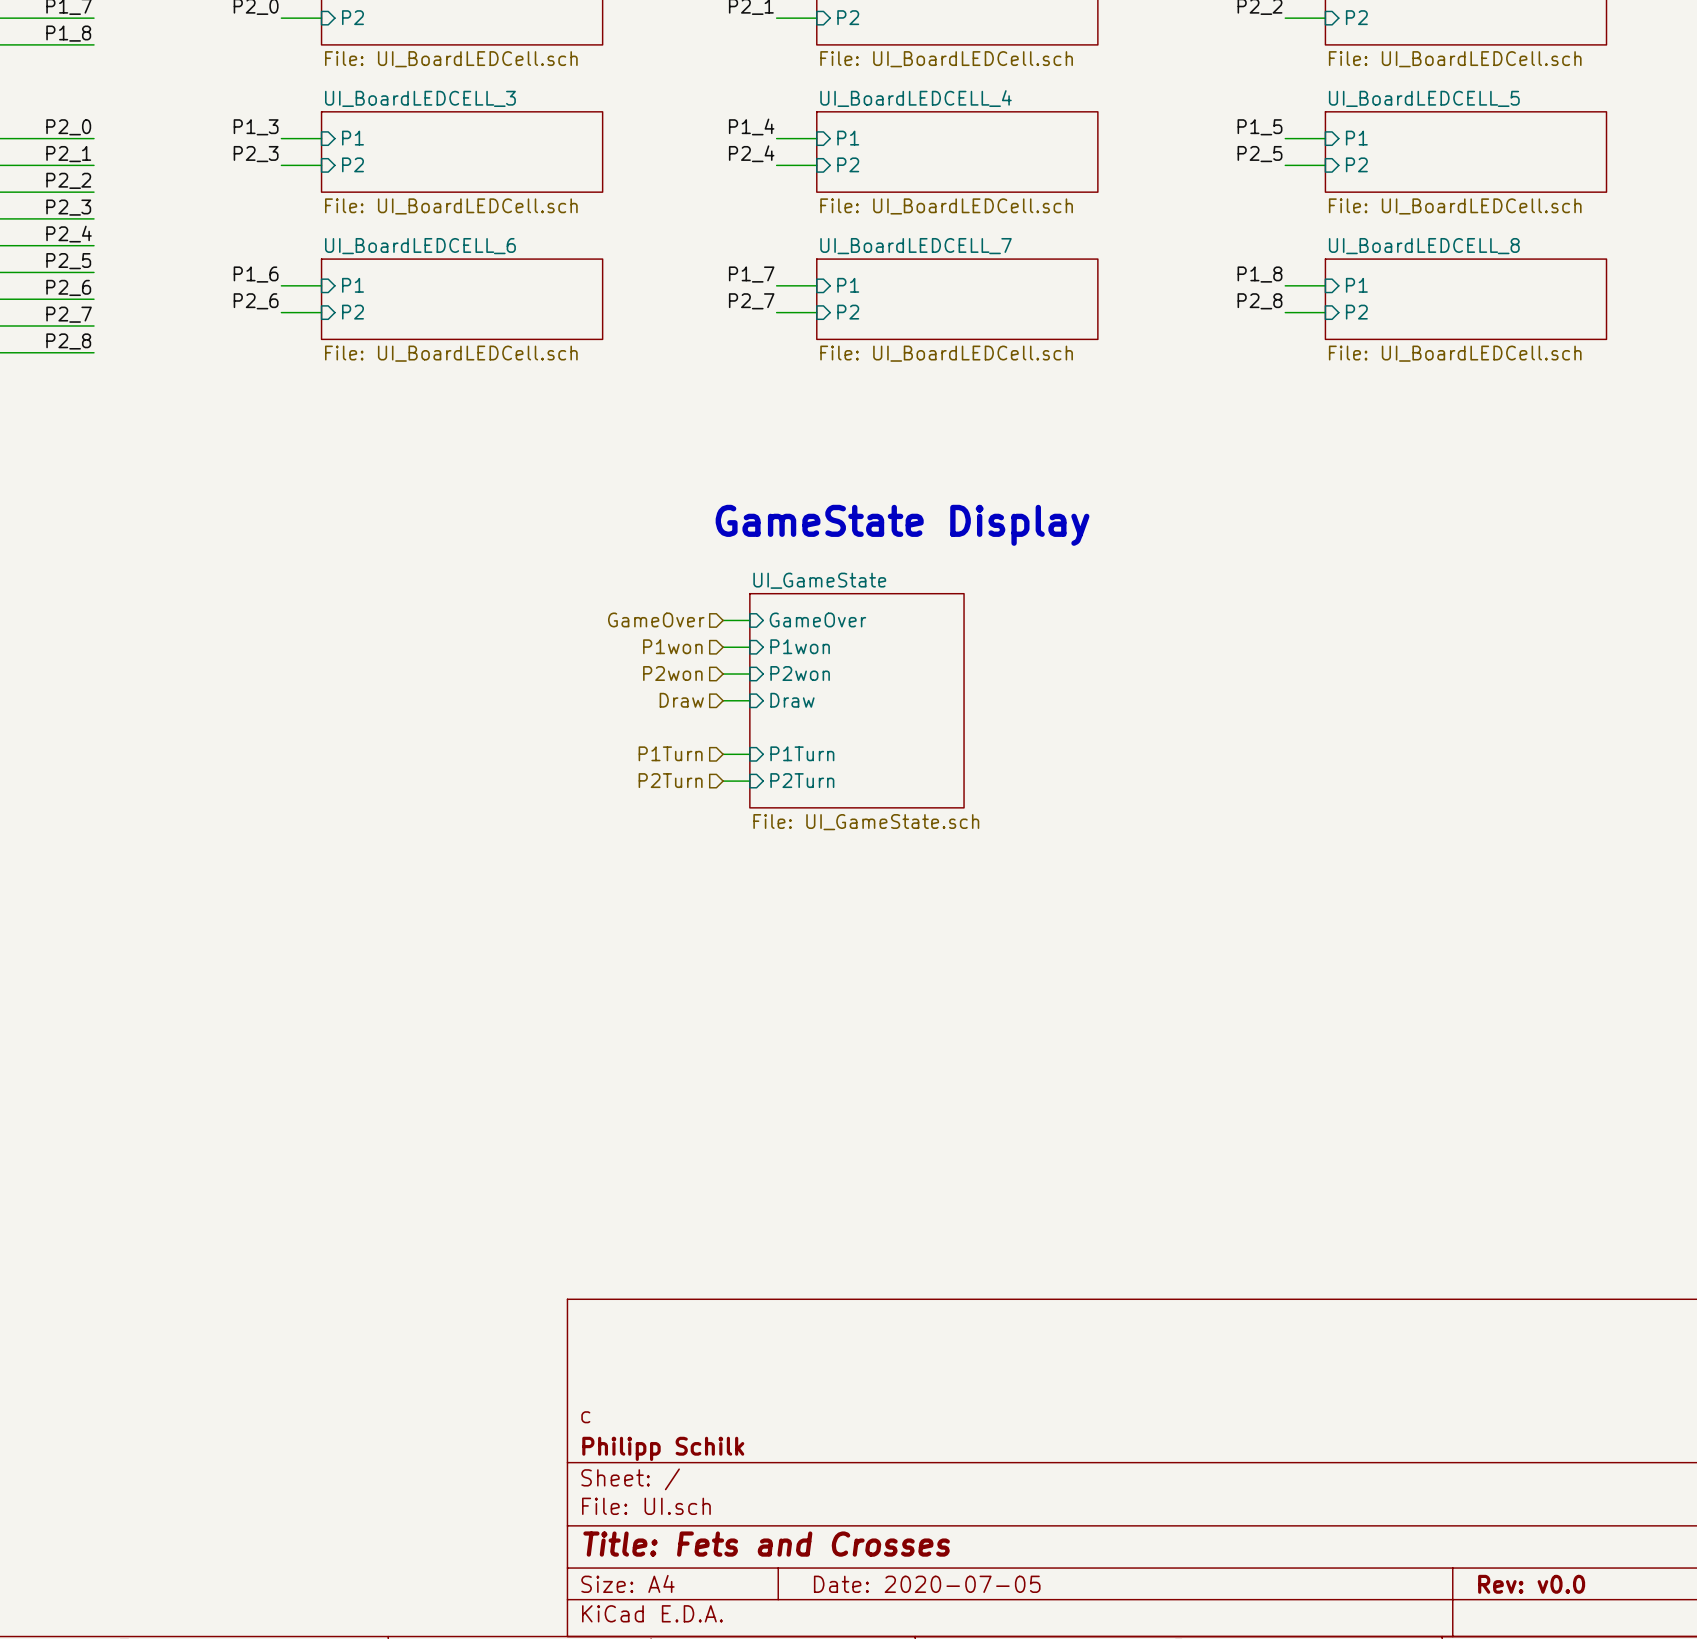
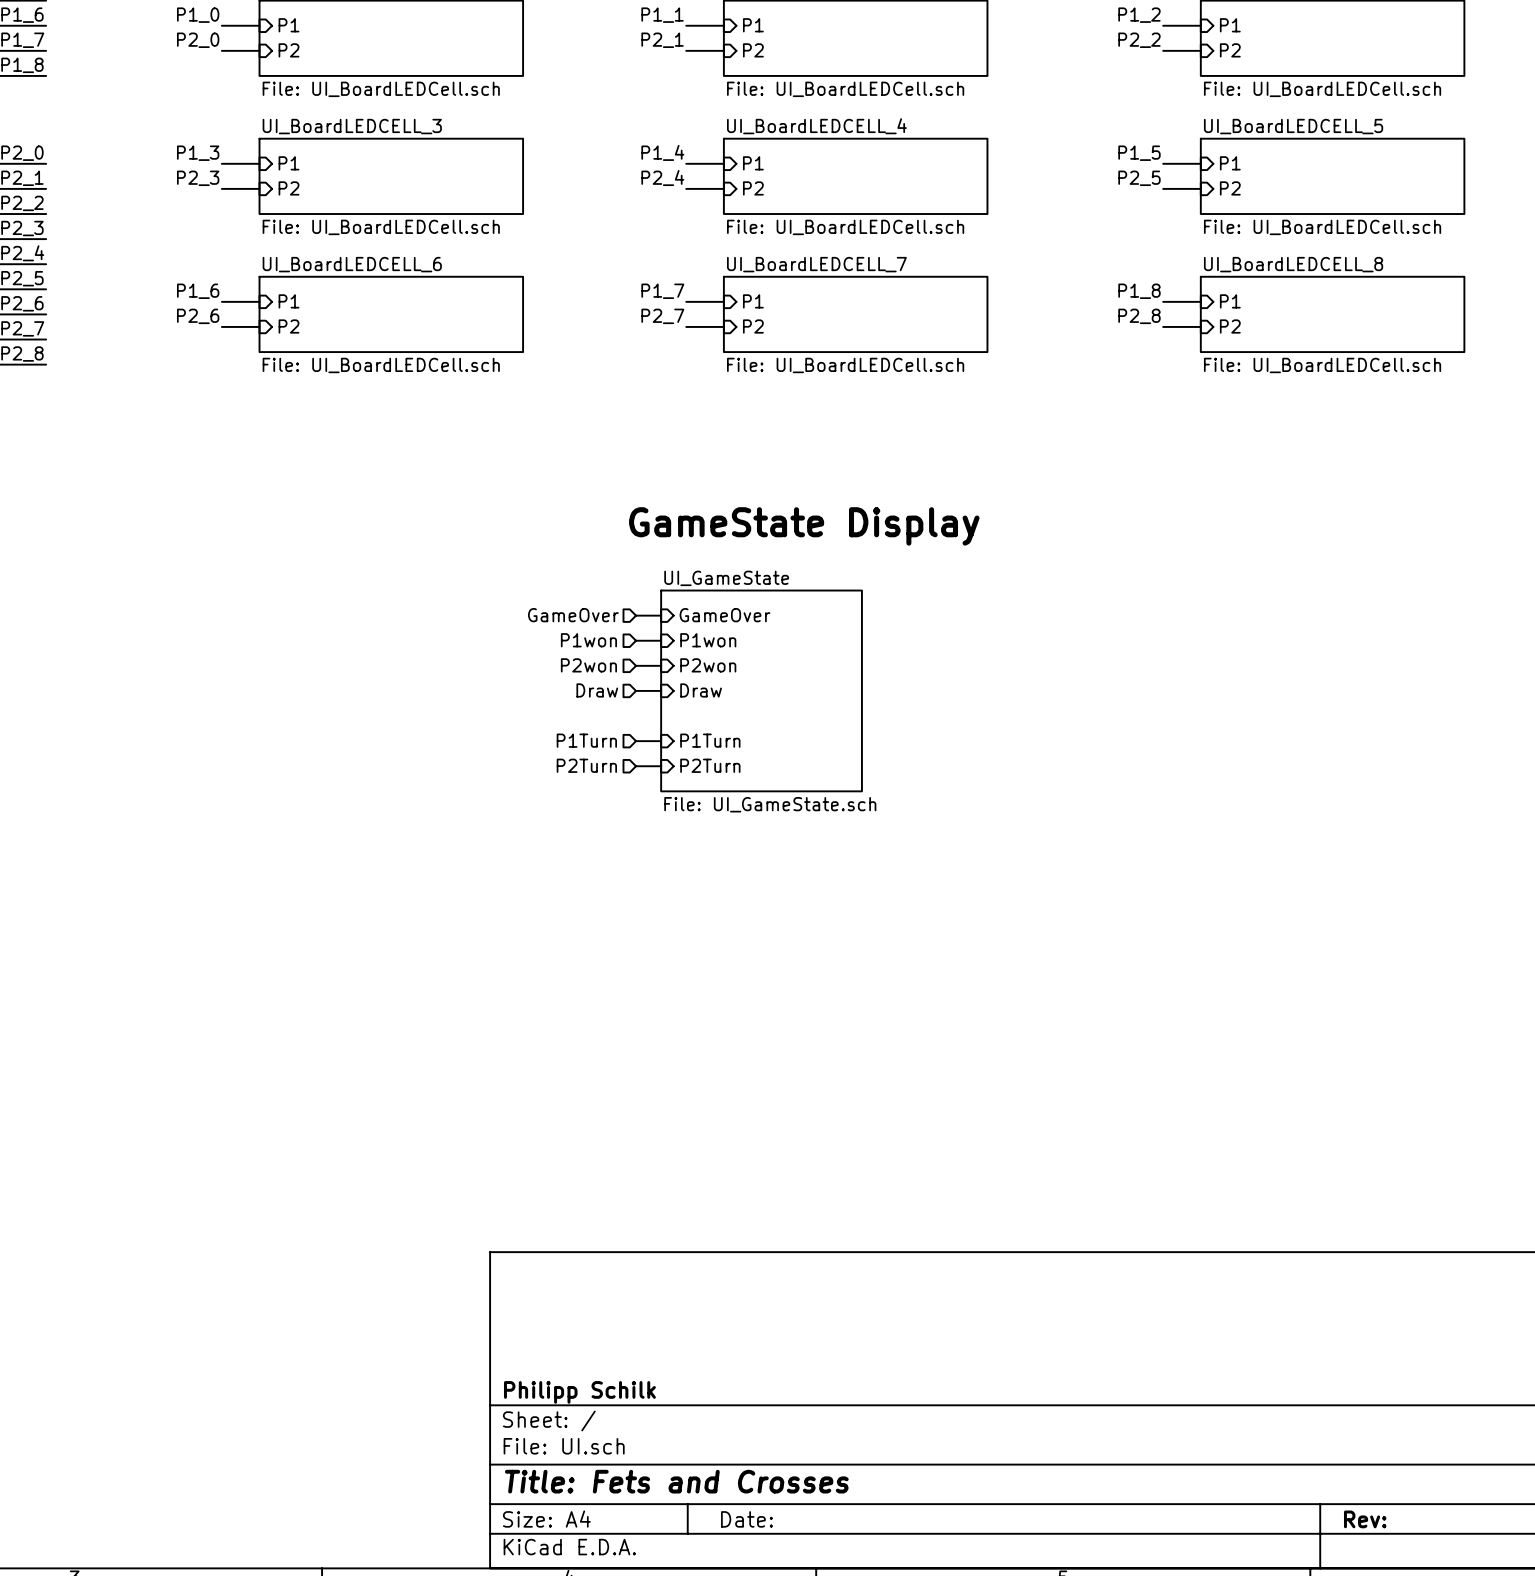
title block: c (585, 1417) -> none
title block: Date: 2020-07-05 (927, 1584) -> Date: (746, 1519)
title block: Rev: v0.0 (1531, 1584) -> Rev: (1365, 1519)

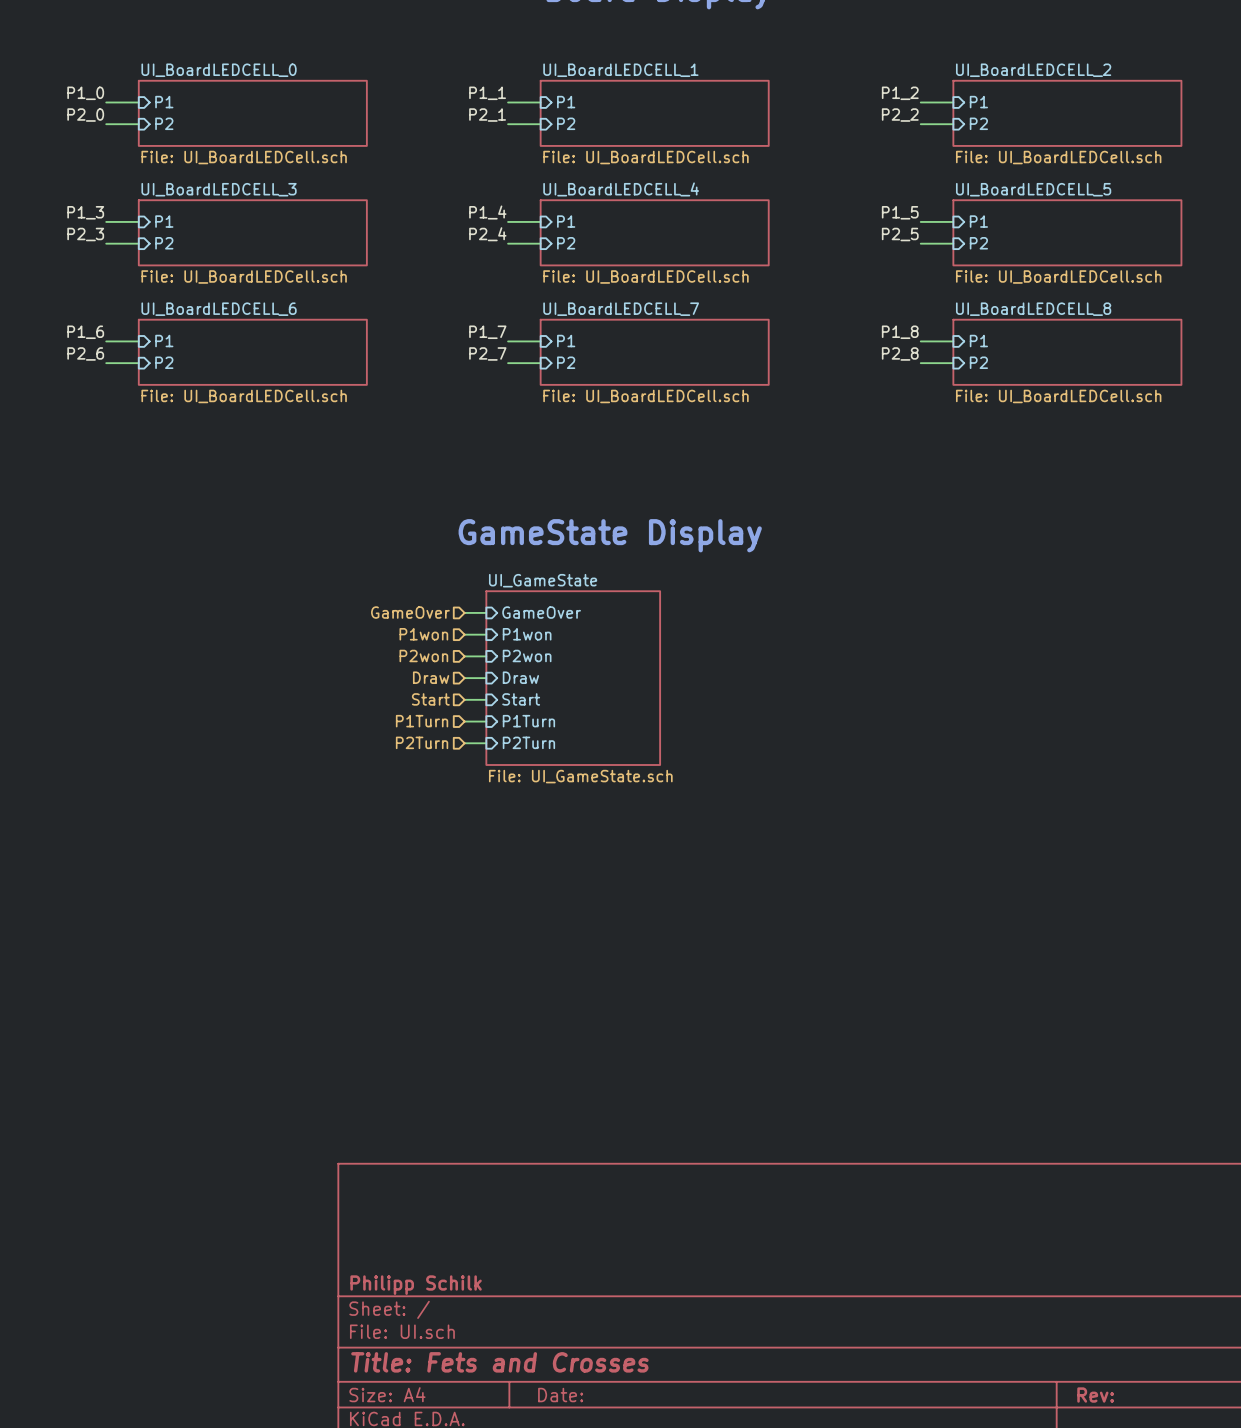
hierarchical label: none -> Start (430, 699)
sheet pin: none -> Start (521, 699)
wire: none -> (464, 699) (486, 699)

